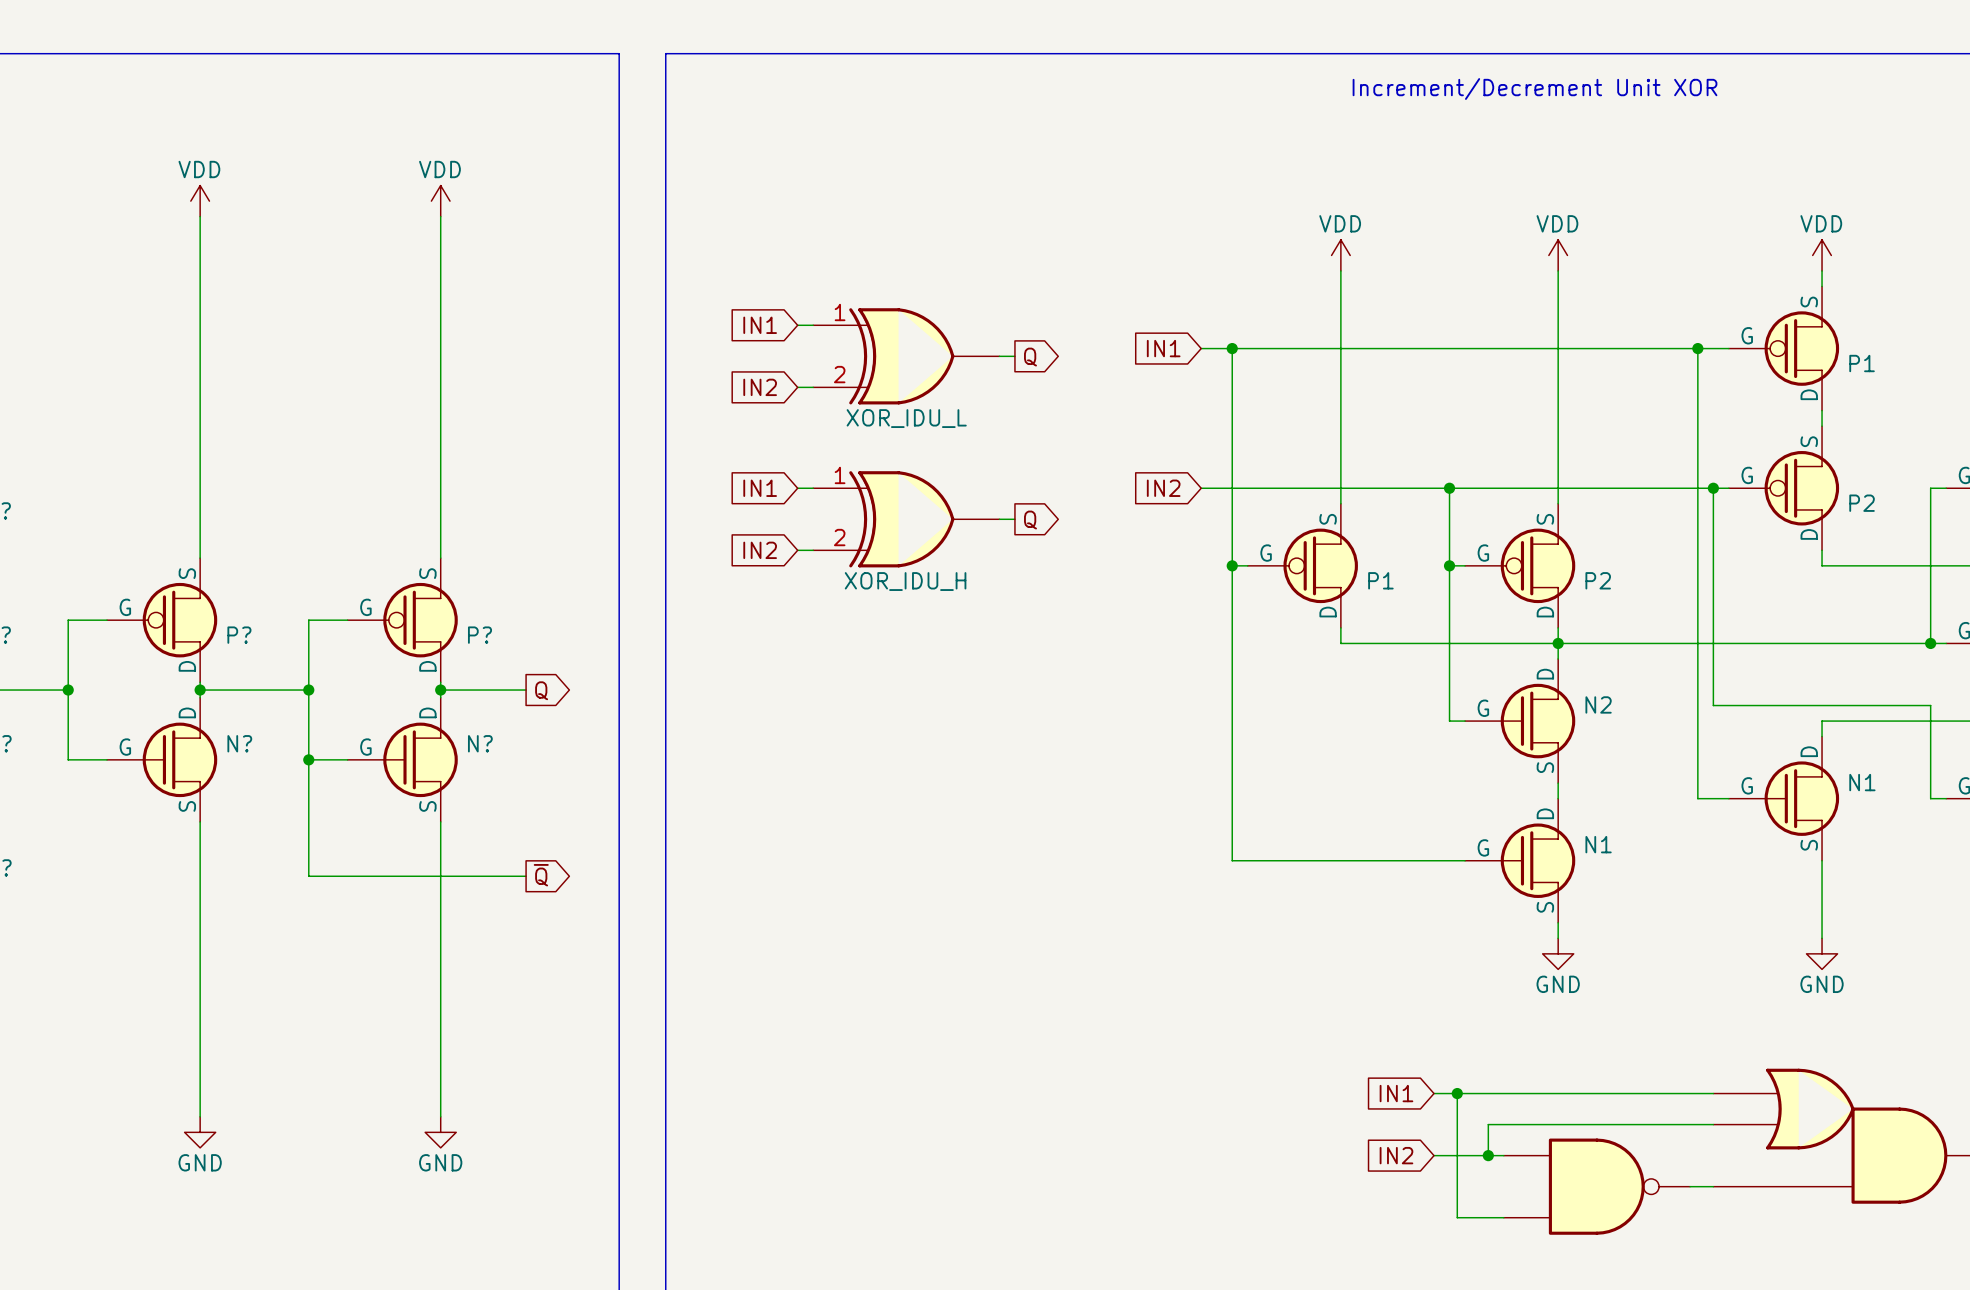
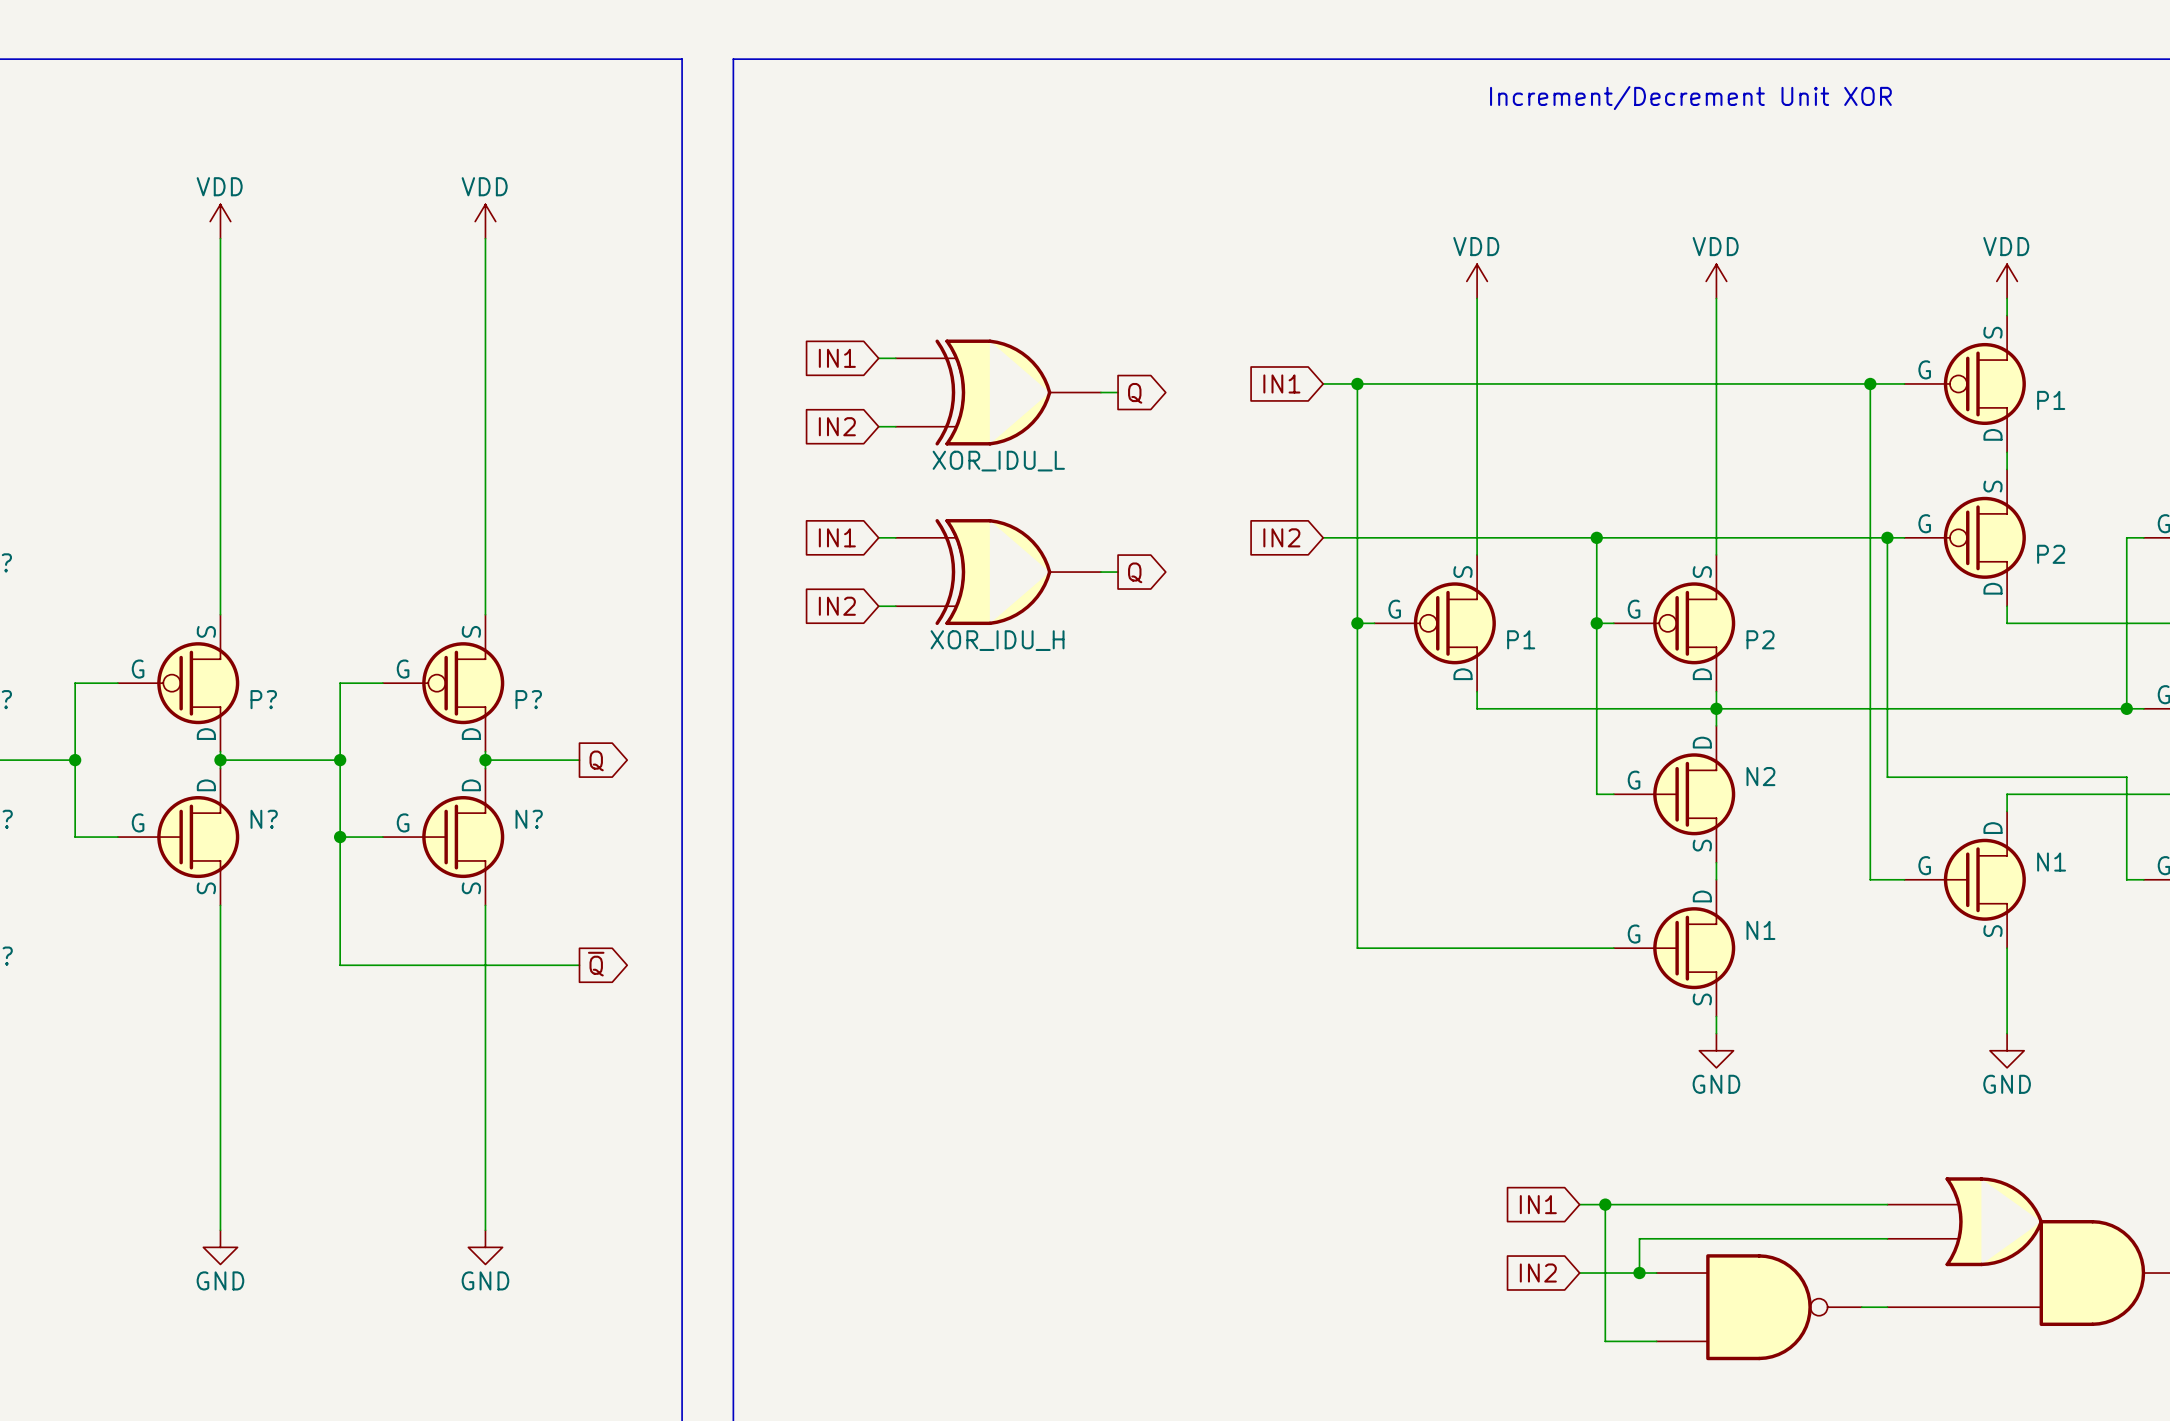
part pin number: 1 (840, 312) -> none
part pin number: 2 (839, 374) -> none
part pin number: 1 (840, 475) -> none
part pin number: 2 (839, 537) -> none

